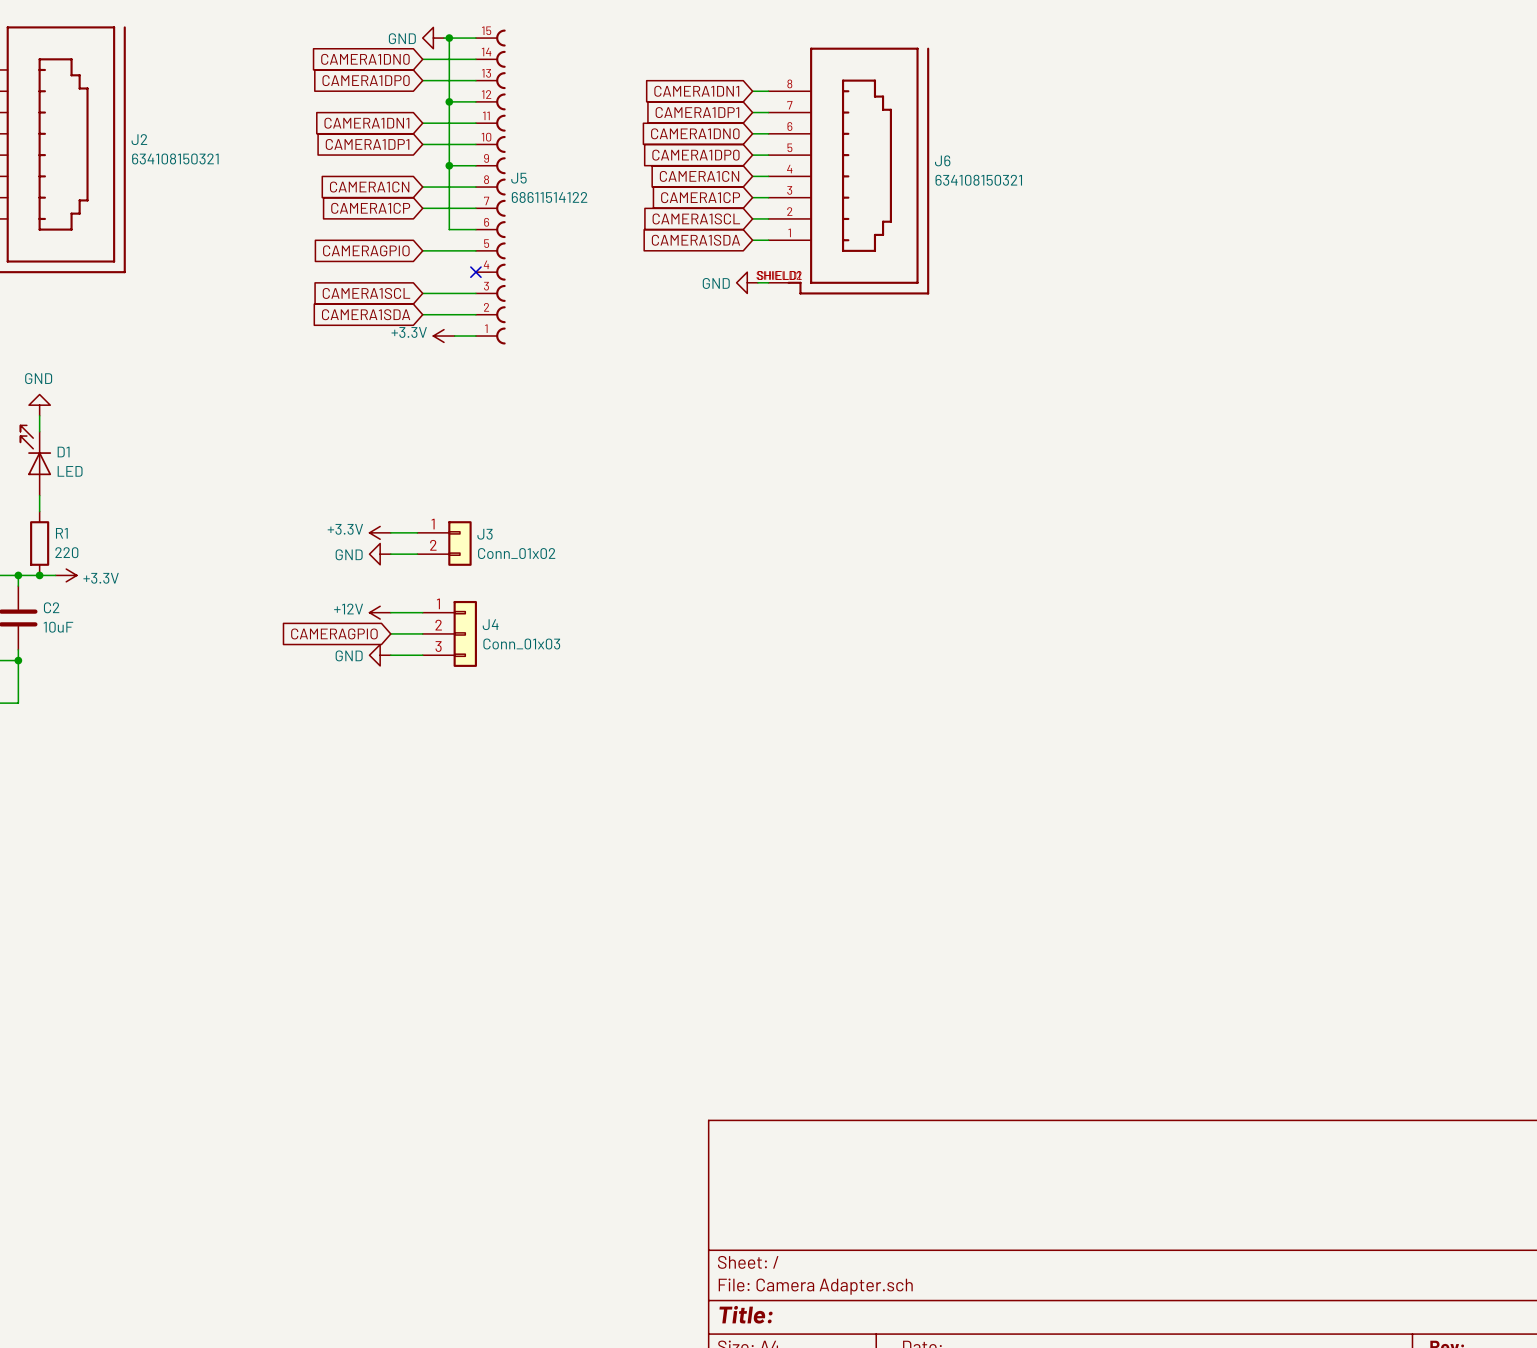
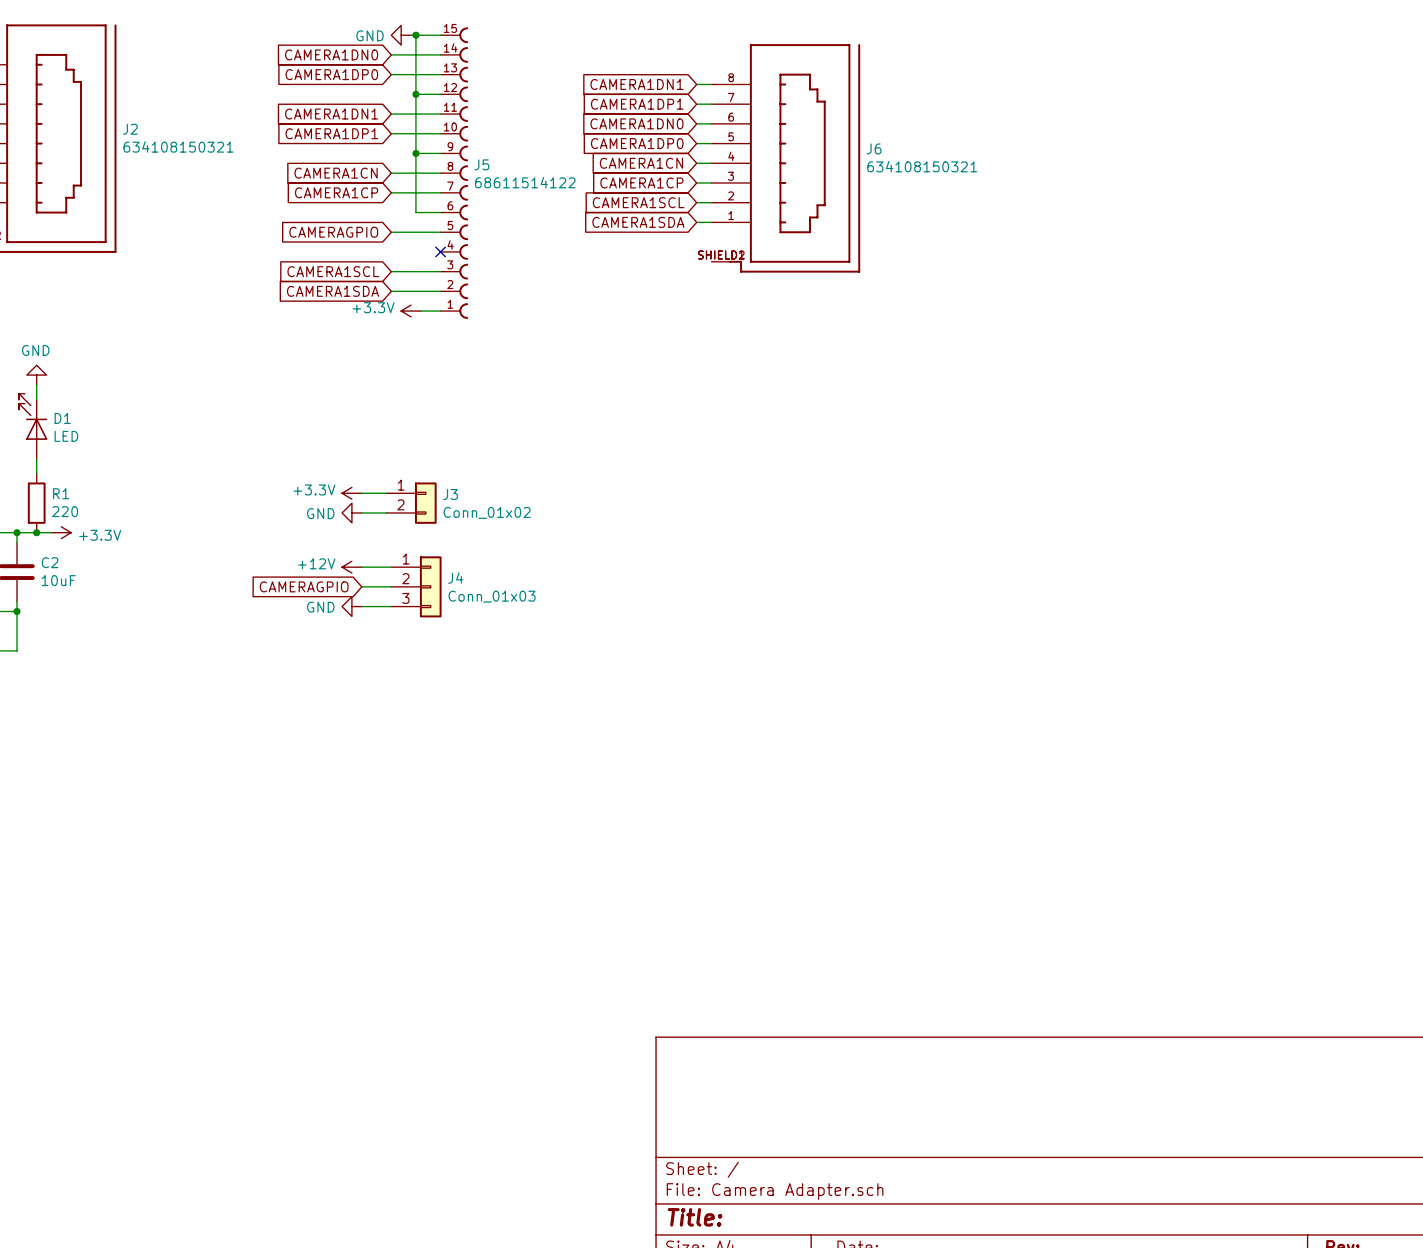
power symbol: GND (747, 282) -> none
wire: (757, 282) (768, 282) -> none

